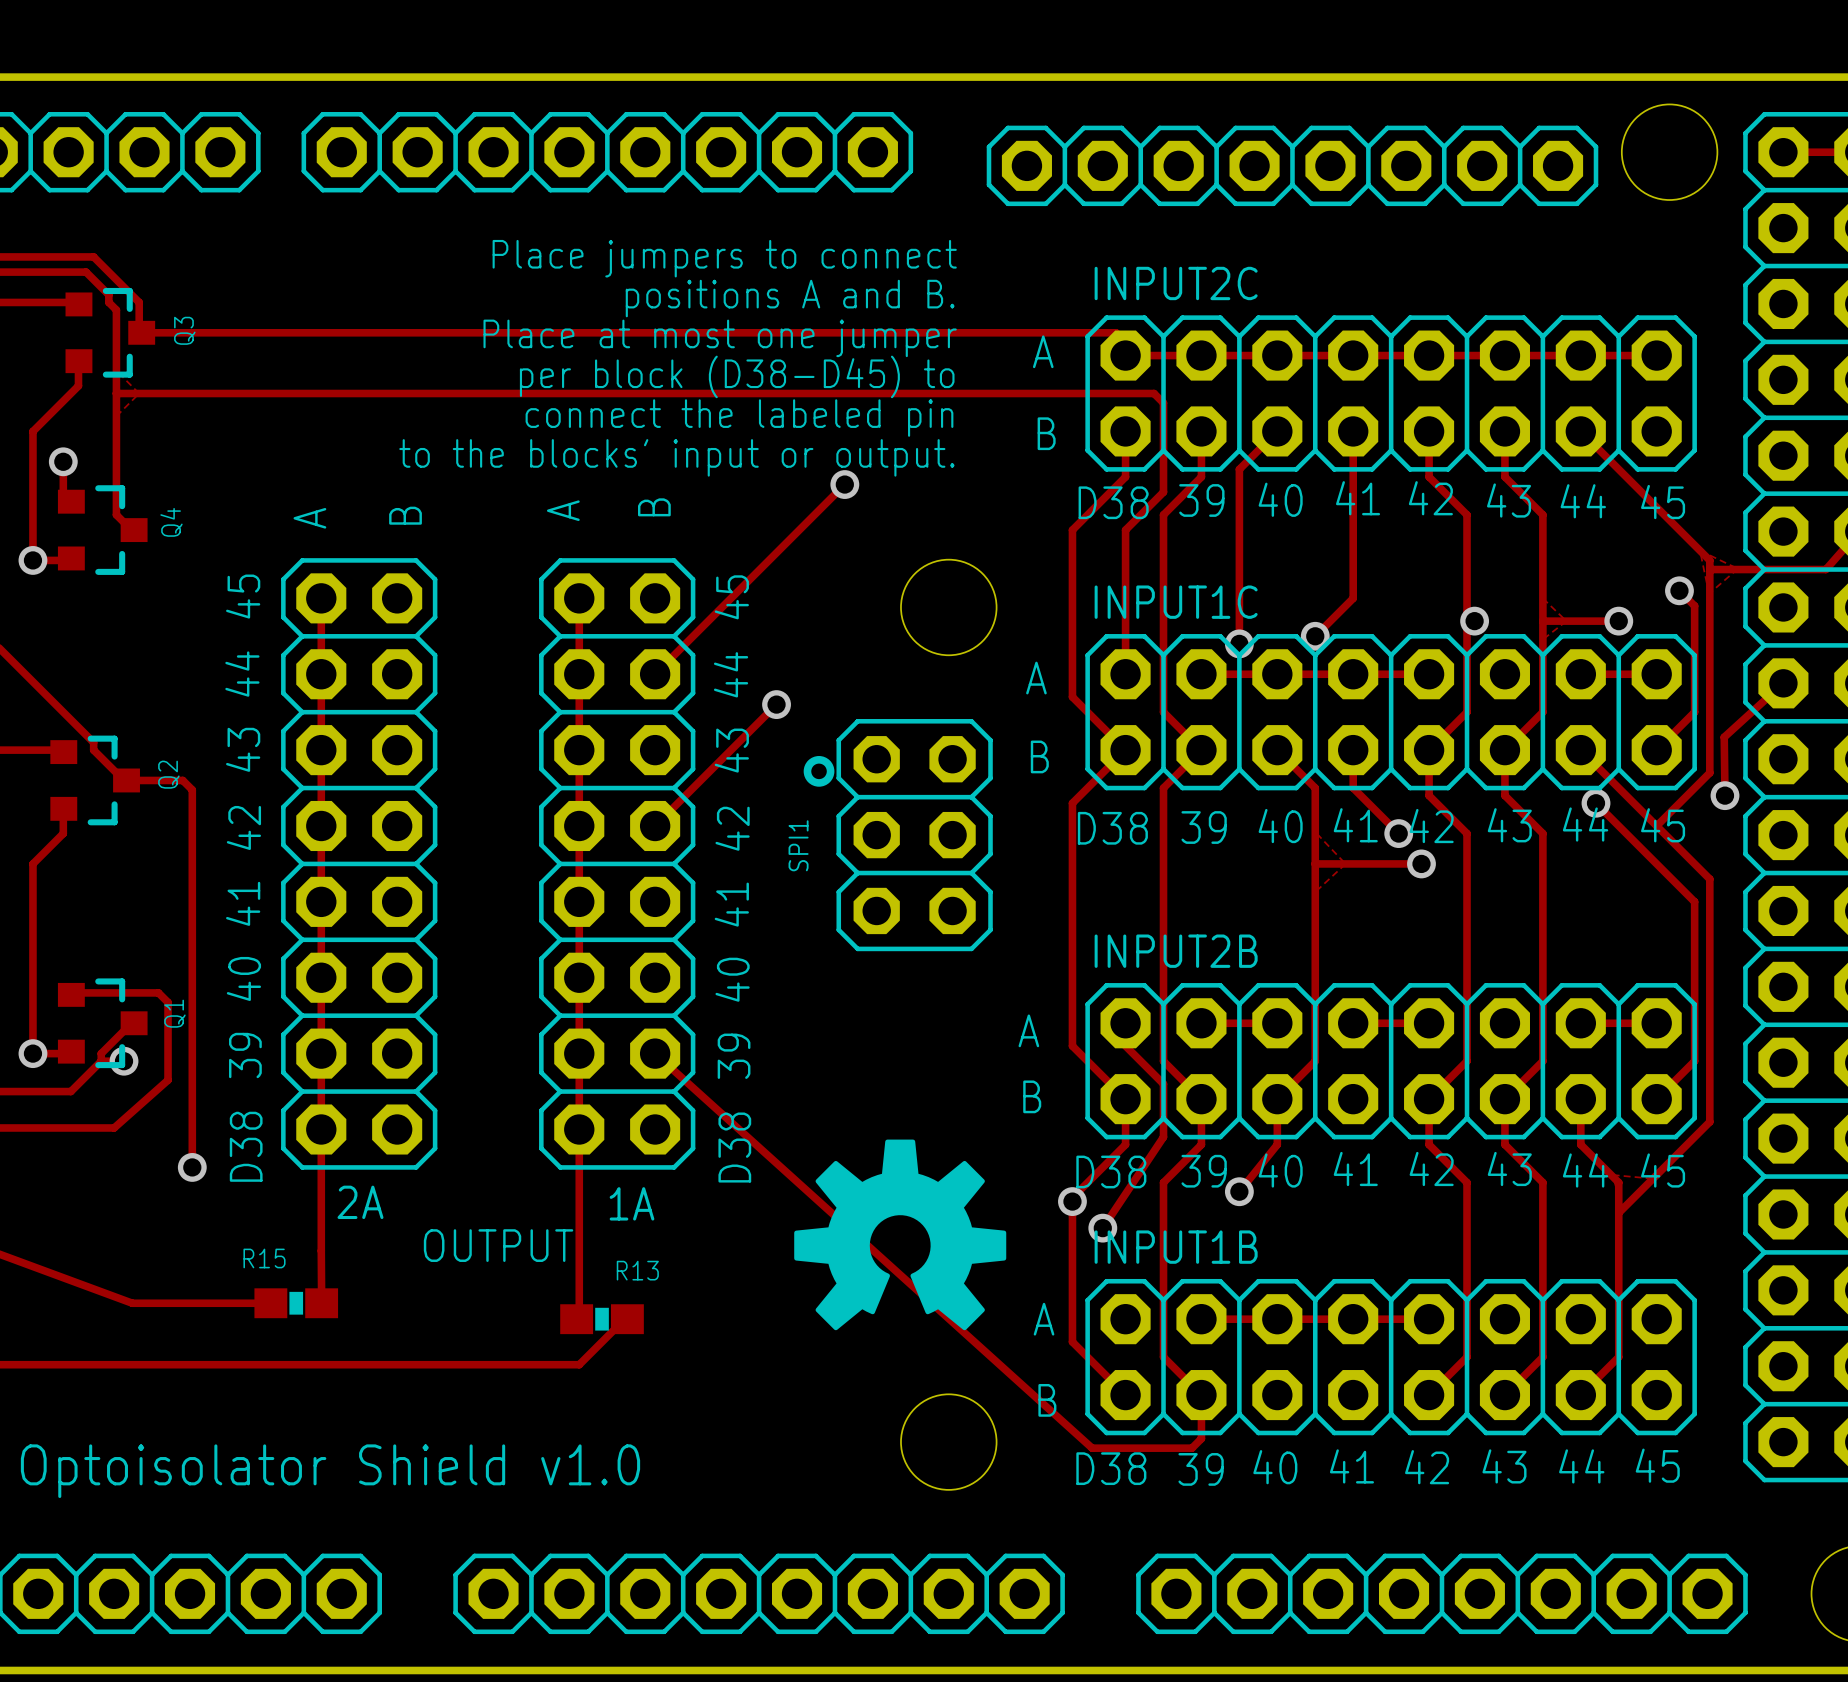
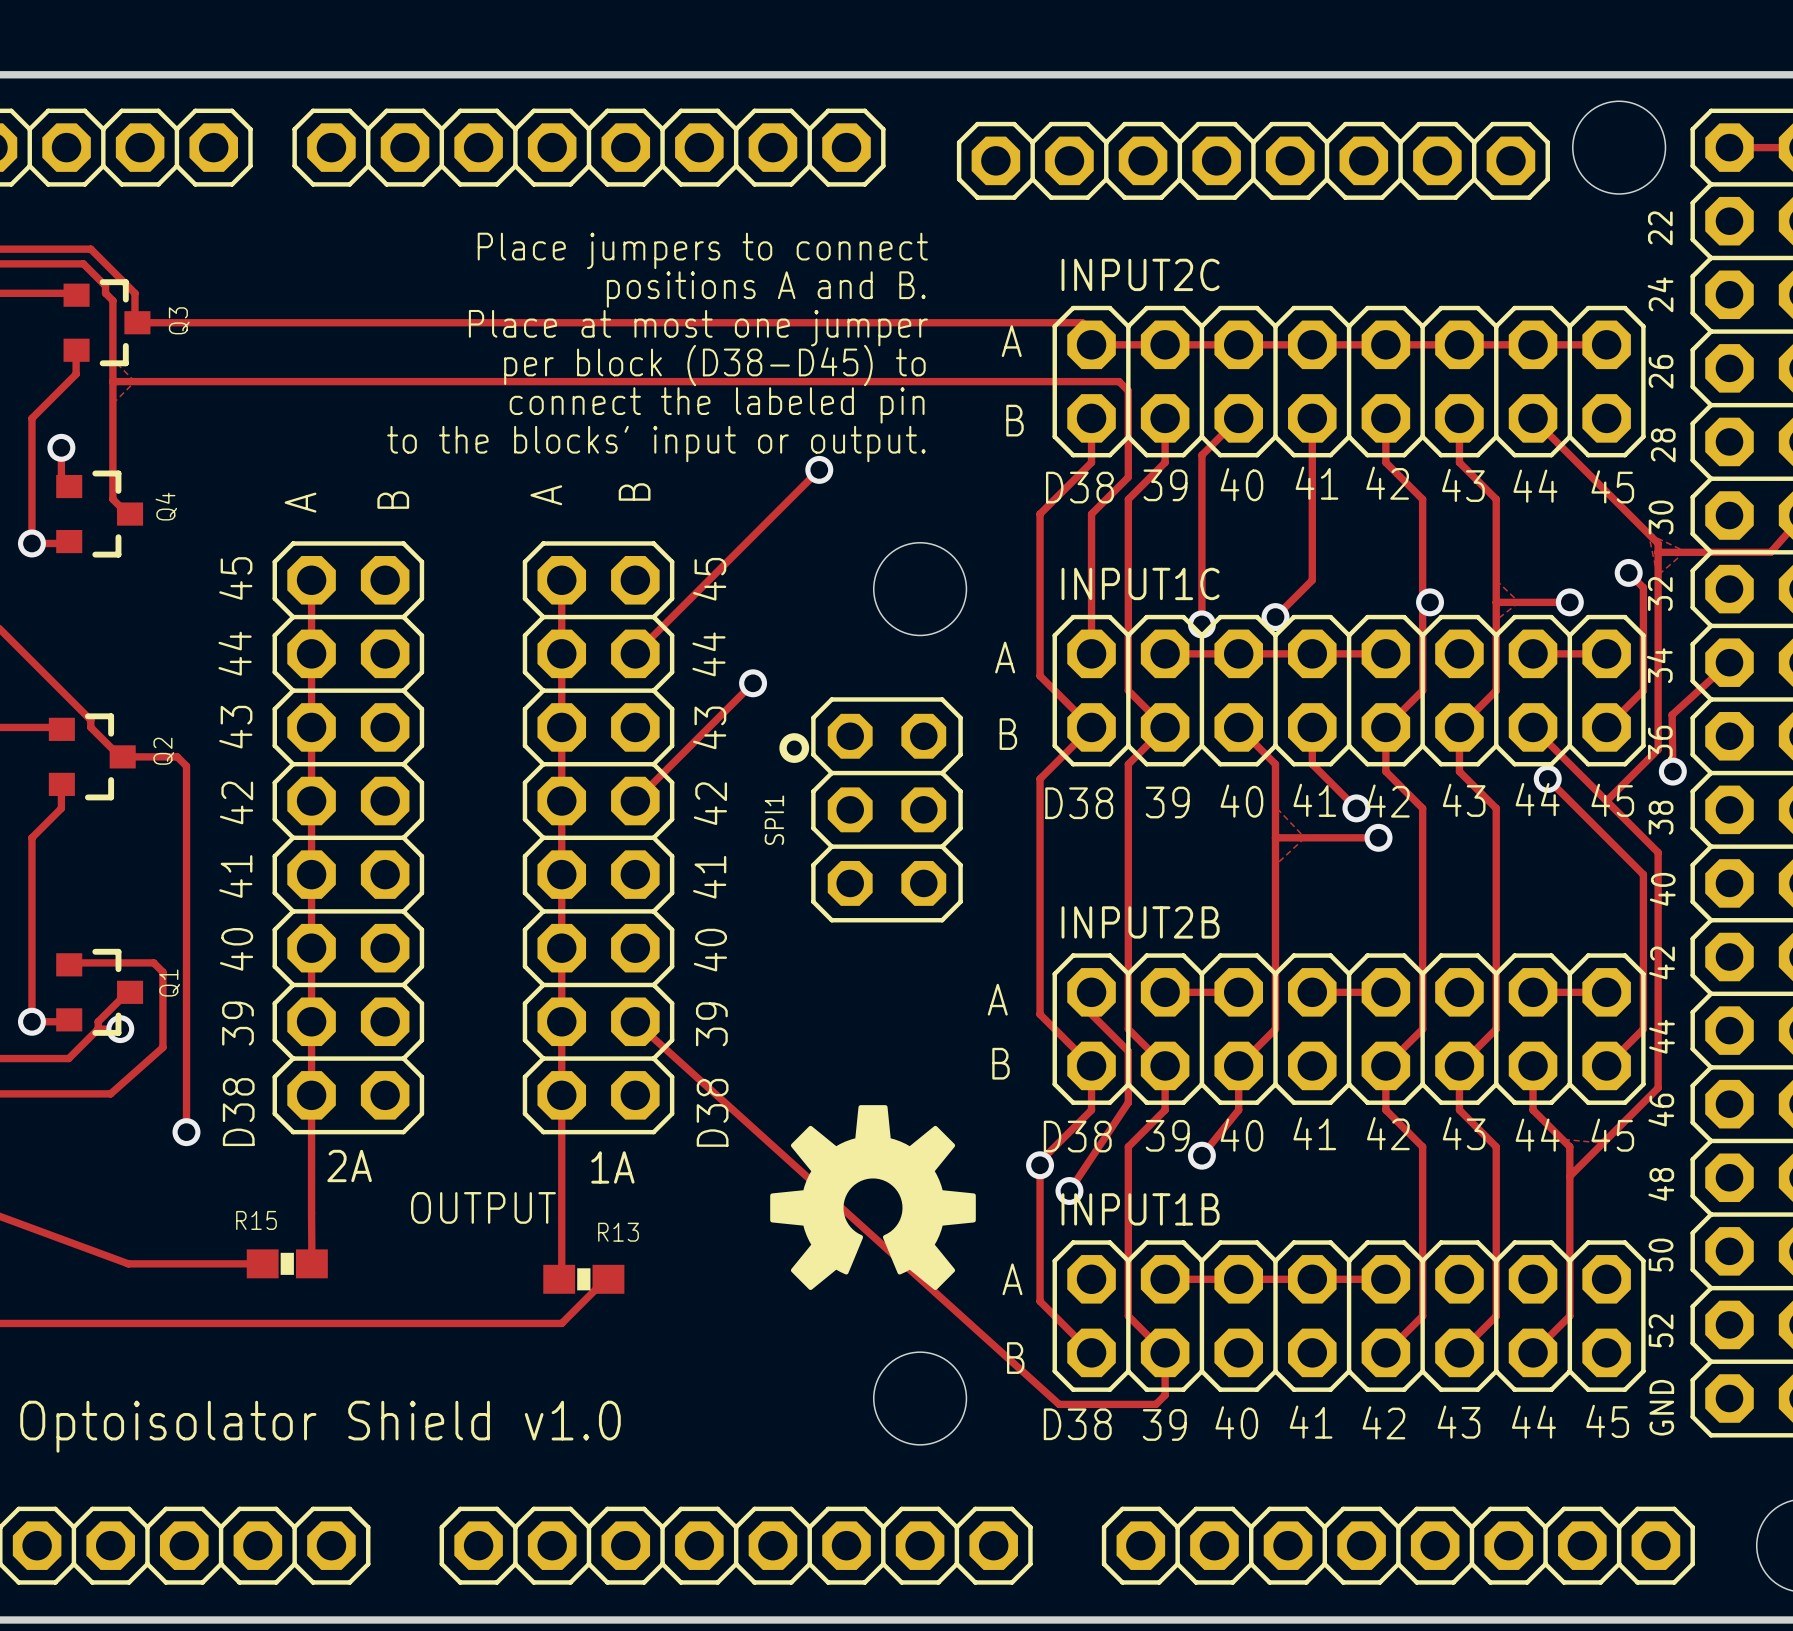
text: none -> 22 (1660, 228)
text: none -> 24 (1660, 294)
text: none -> 26 (1661, 371)
text: none -> 28 (1663, 445)
text: none -> 30 (1661, 517)
text: none -> 32 (1660, 594)
text: none -> 34 (1659, 665)
text: none -> 36 (1660, 742)
text: none -> 38 (1661, 817)
text: none -> 40 (1662, 889)
text: none -> 42 (1662, 962)
text: none -> 44 (1662, 1036)
text: none -> 46 (1661, 1110)
text: none -> 48 (1661, 1184)
text: none -> 50 (1661, 1255)
text: none -> 52 (1661, 1330)
text: none -> GND (1661, 1407)

